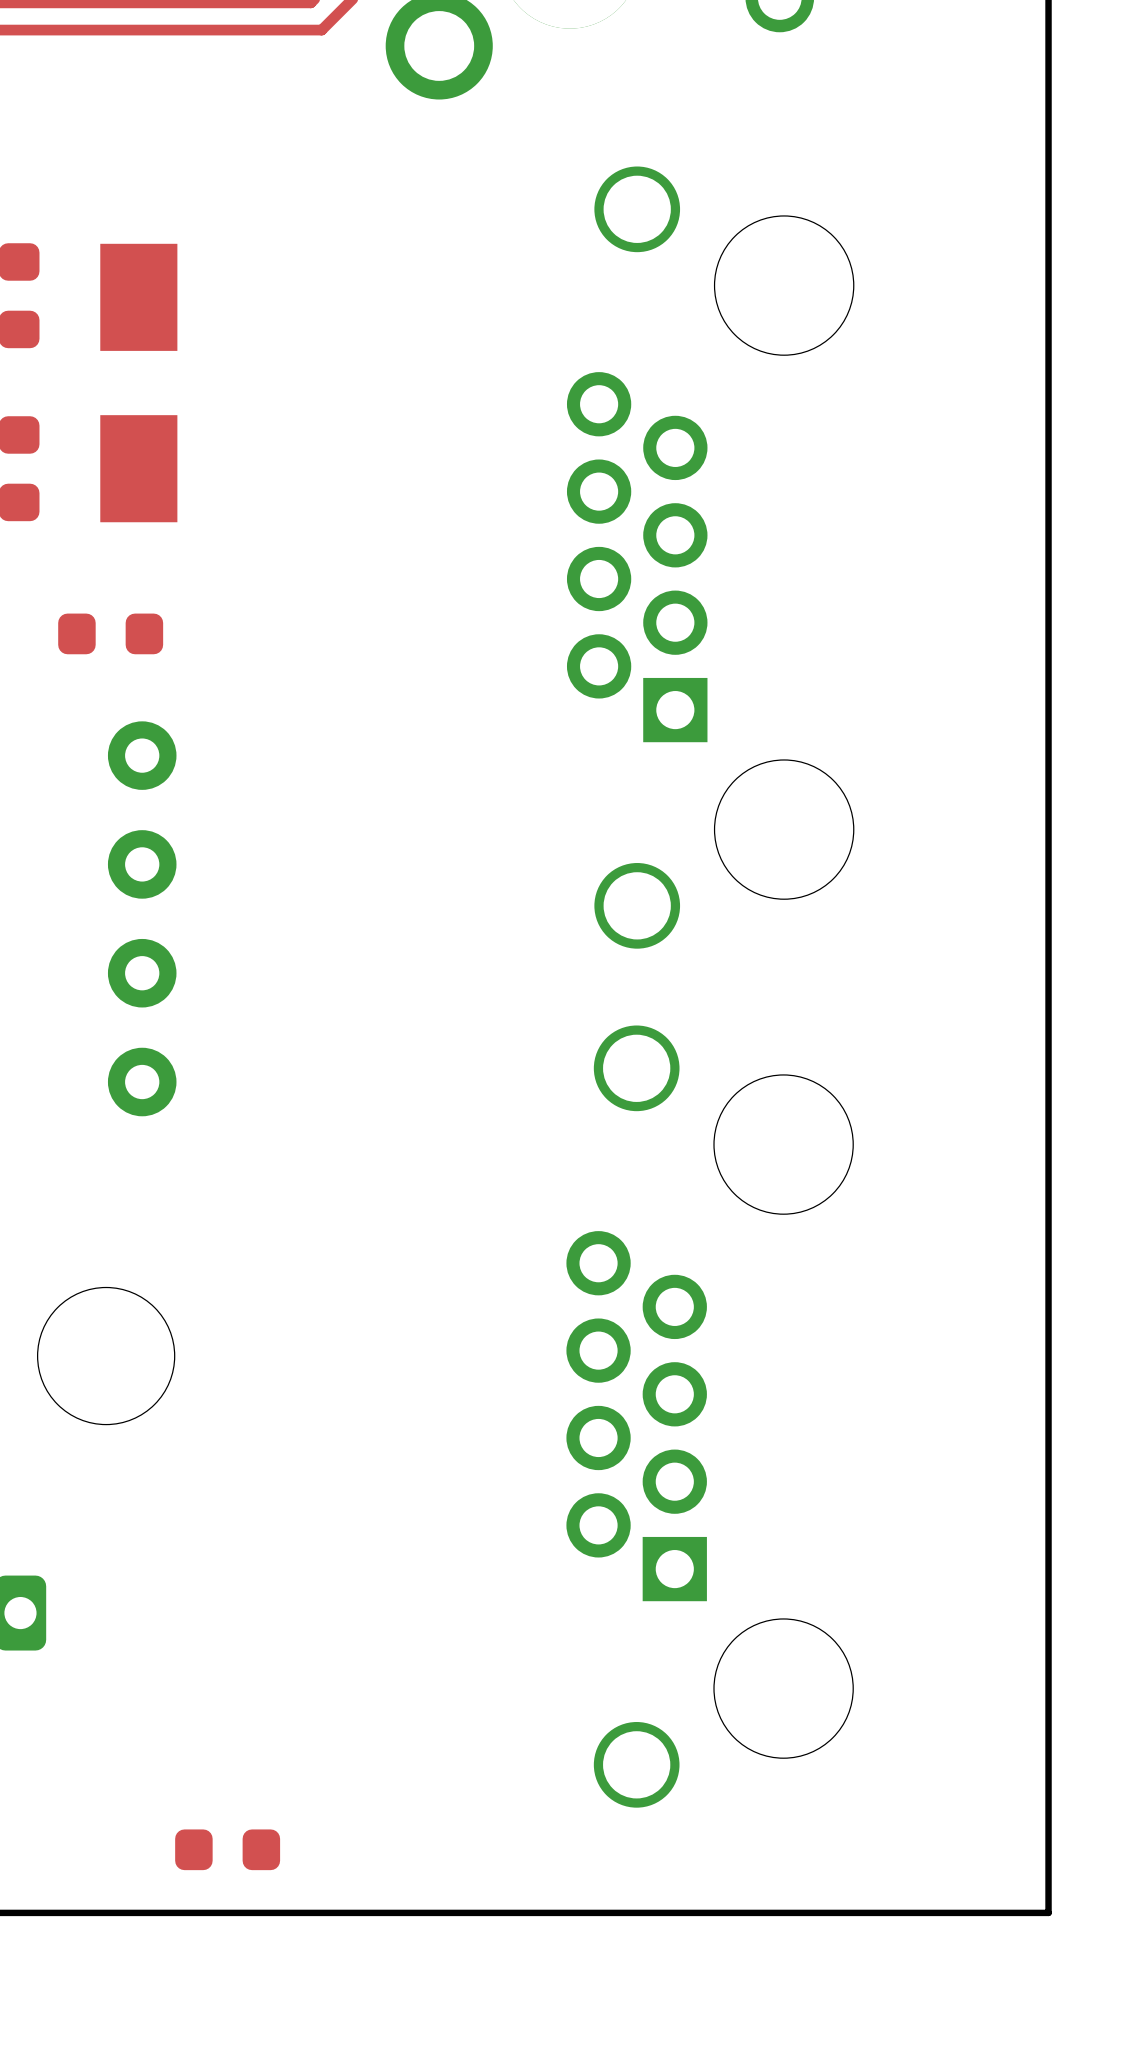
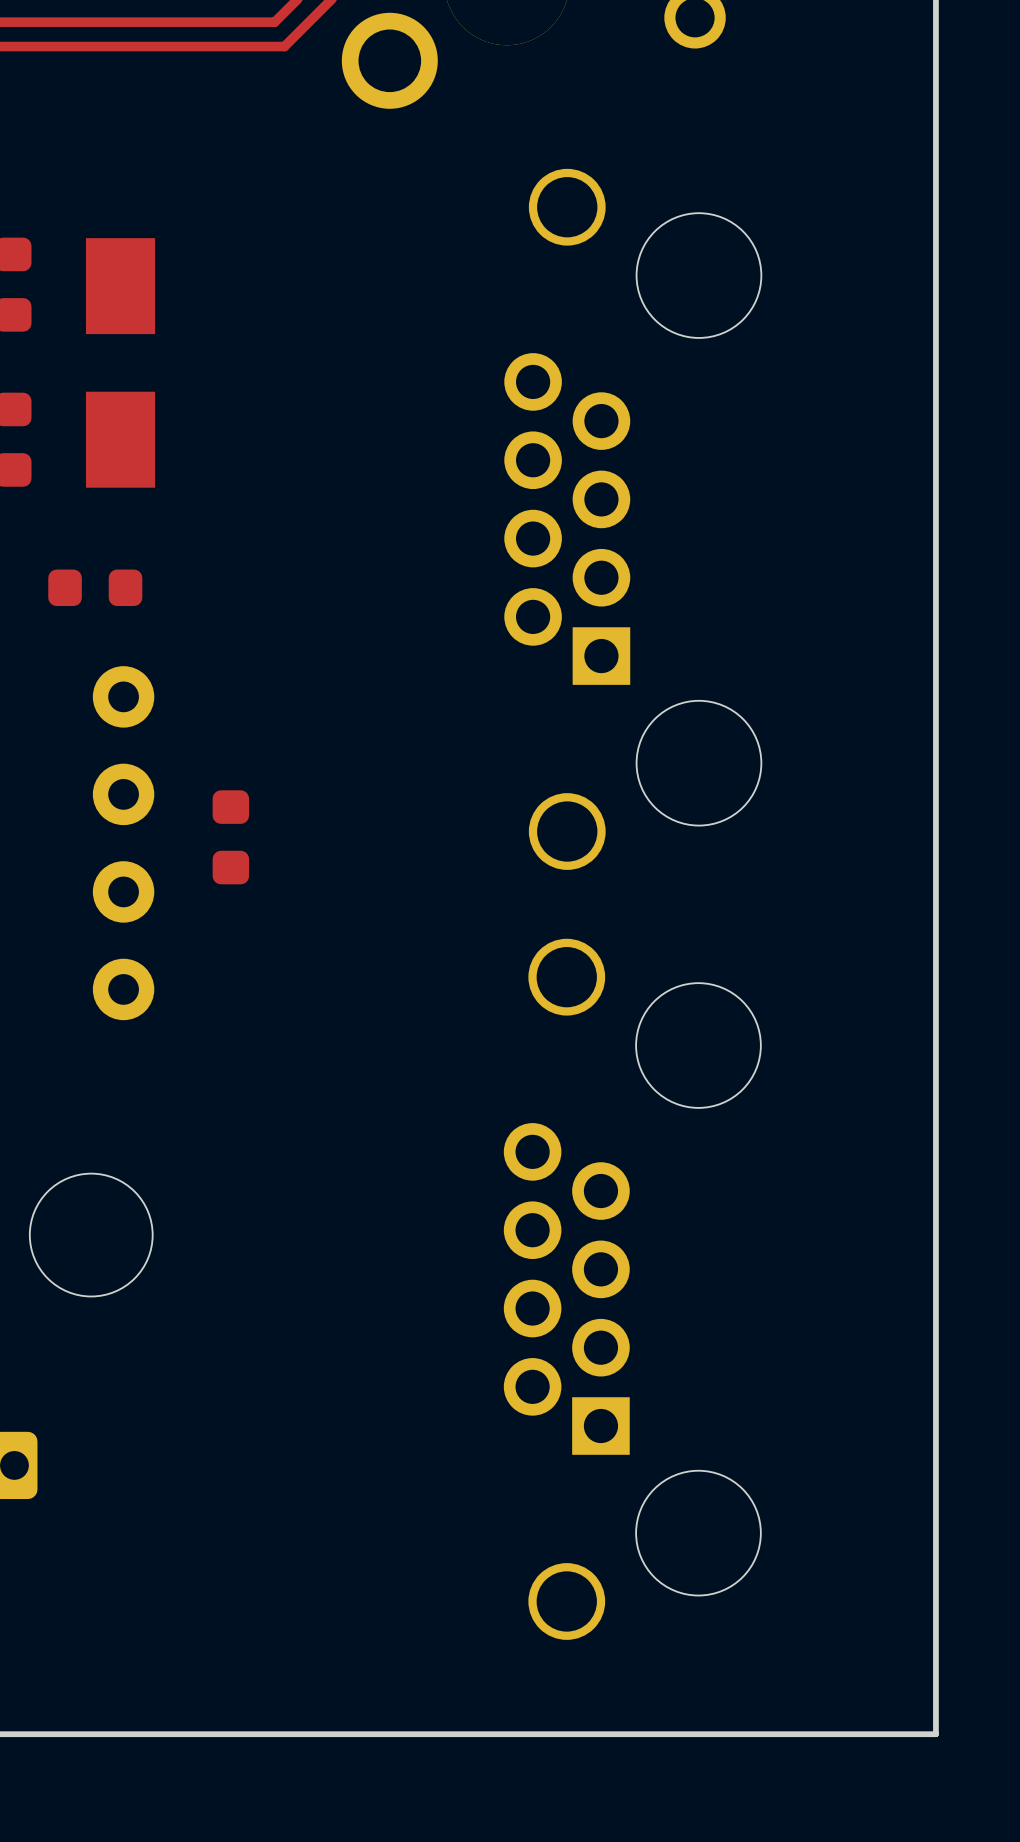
part rotation: 0° (227, 1849) -> 90° clockwise (230, 837)
part position: (227, 1849) -> (230, 837)

